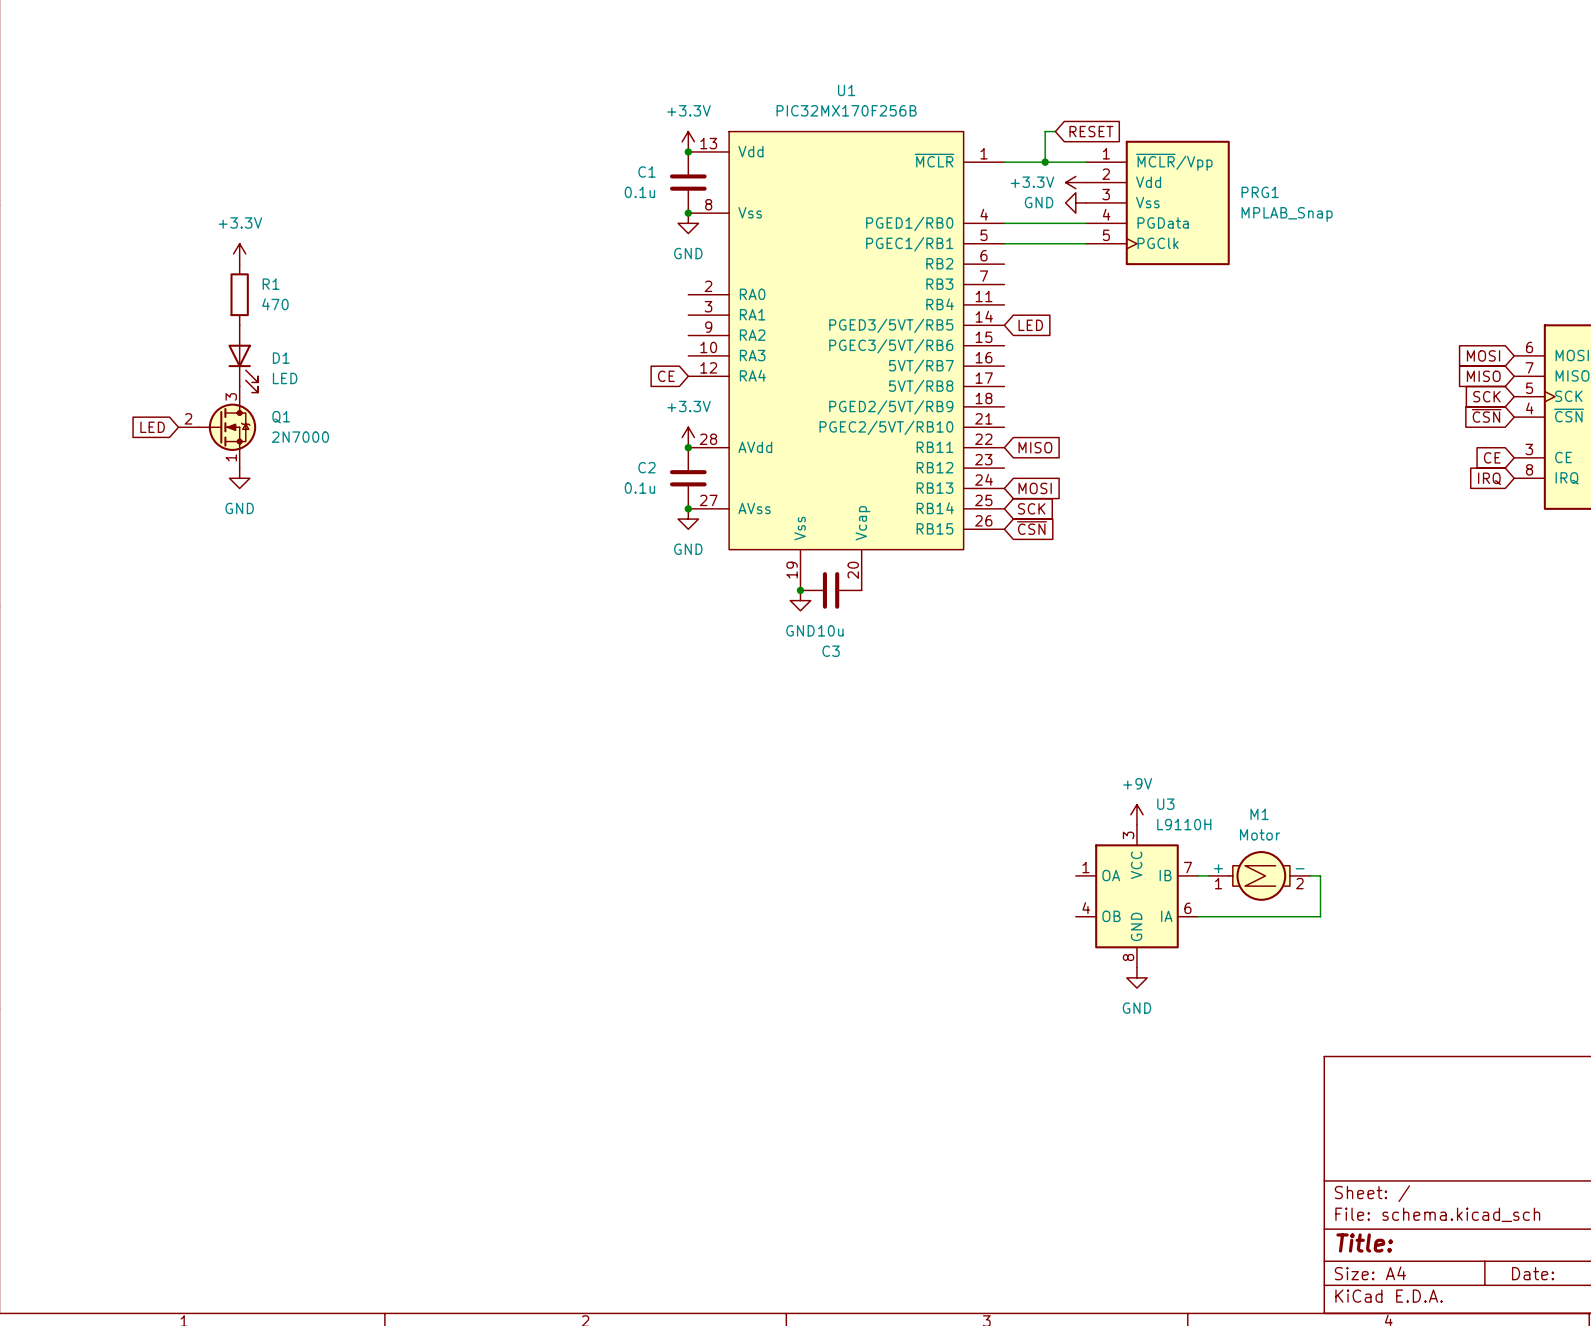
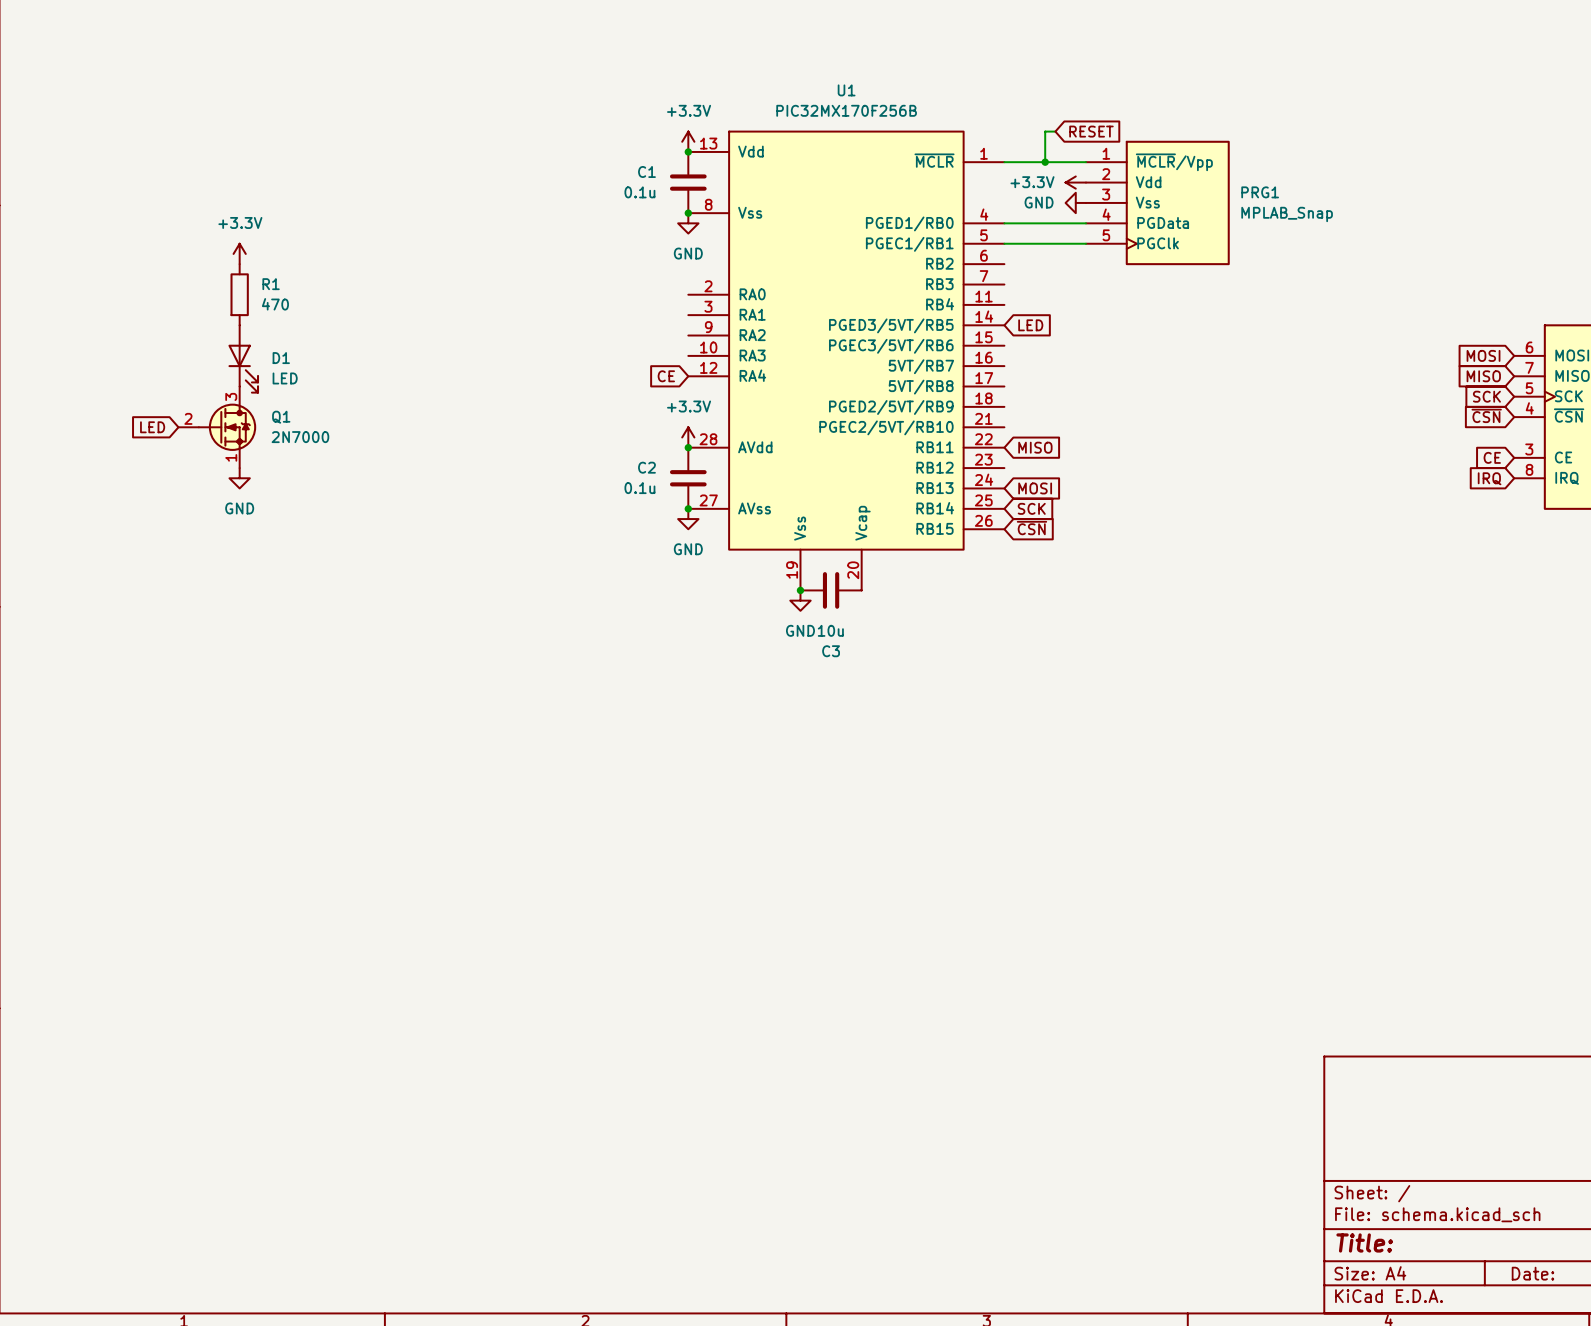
power symbol: +9V (1136, 814) -> none
wire: (1198, 875) (1208, 875) -> none
M1: Motor (1259, 875) -> none
wire: (1310, 875) (1320, 875) (1320, 916) (1198, 916) -> none
U3: L9110H (1136, 896) -> none
power symbol: GND (1136, 977) -> none

